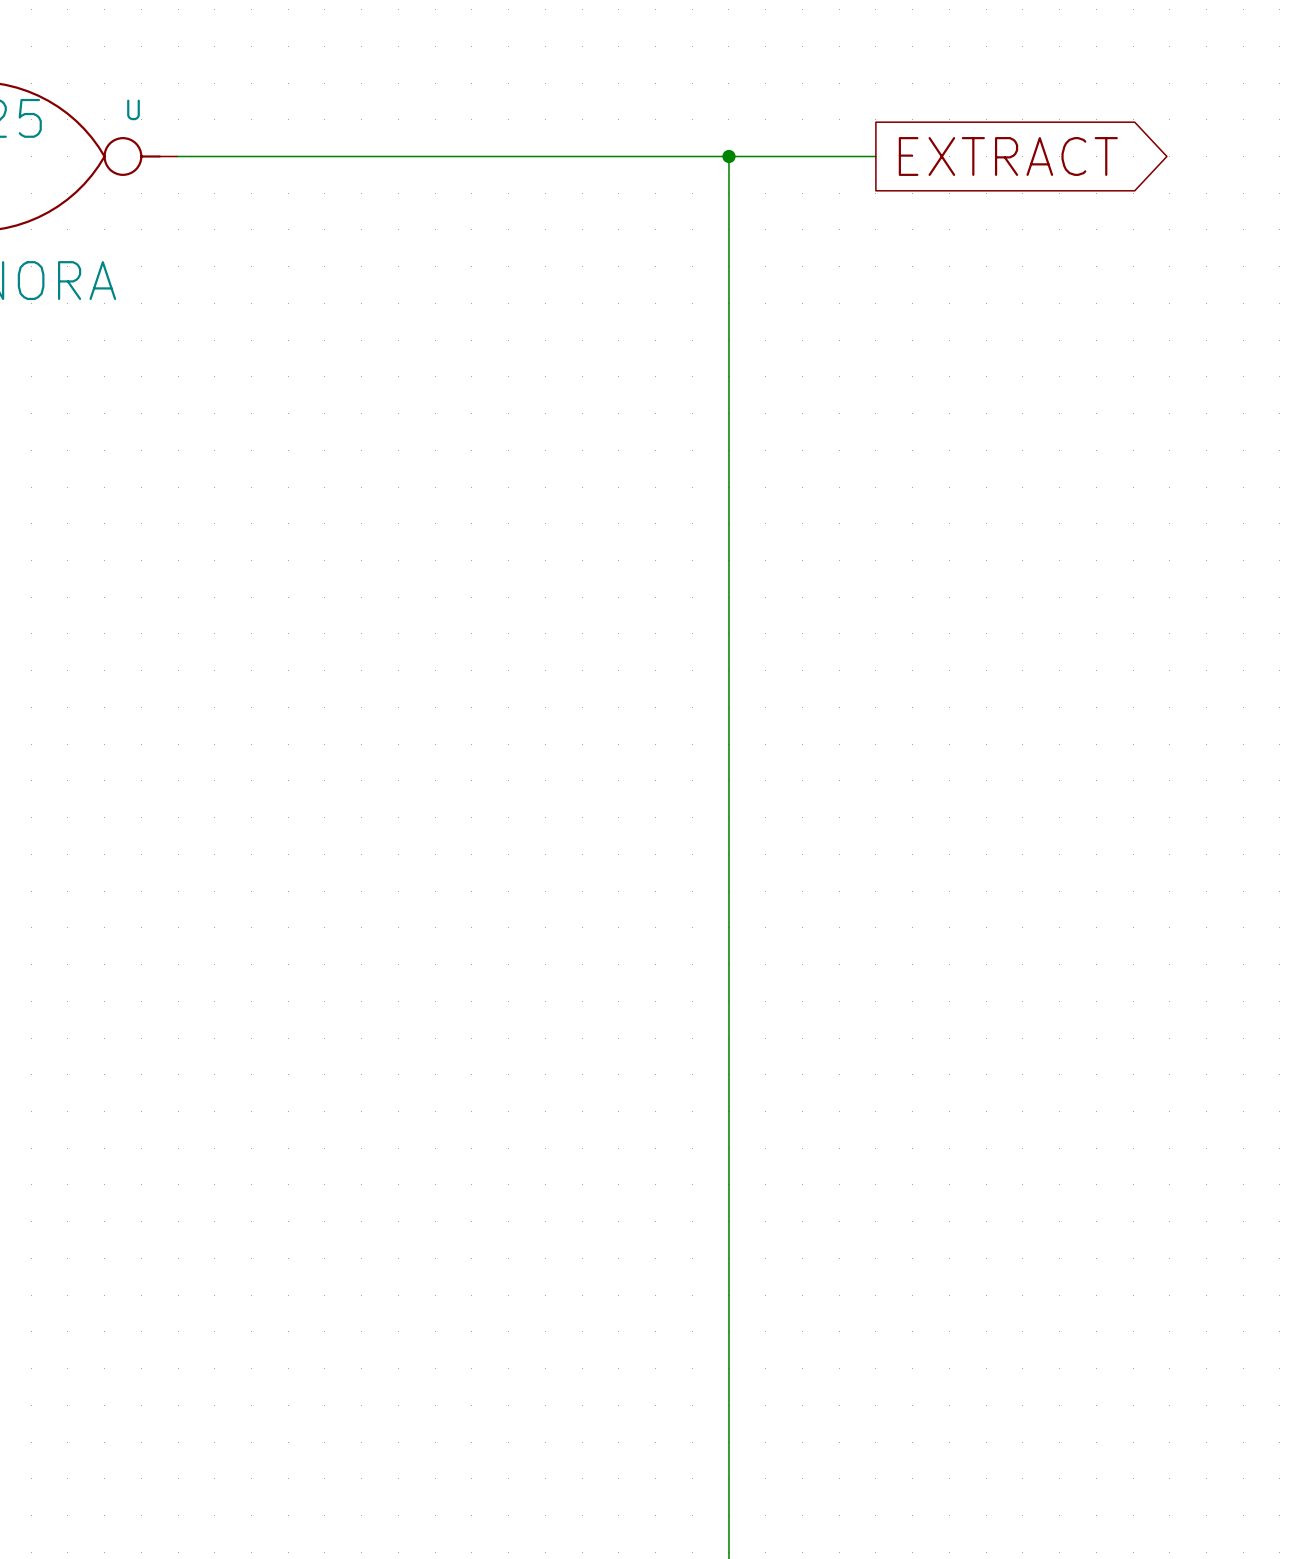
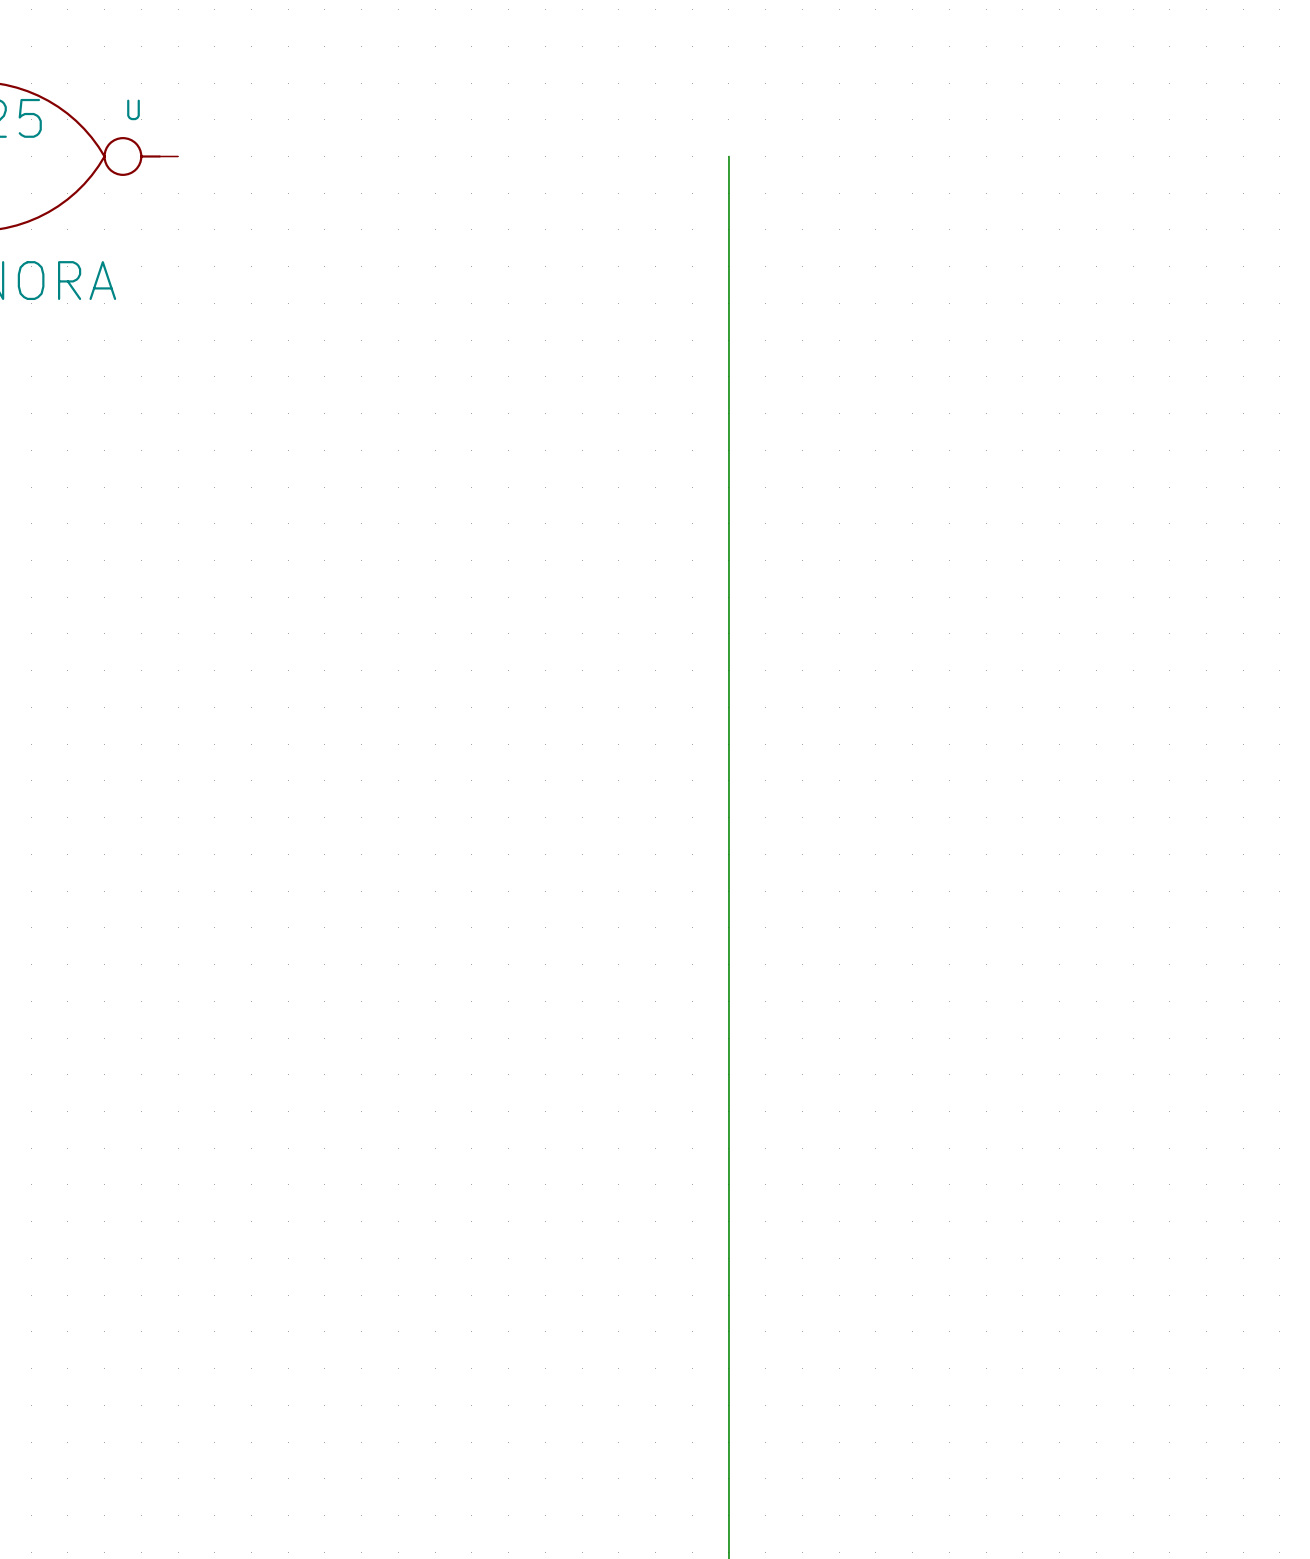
wire: (178, 156) (875, 156) -> none
junction: (728, 156) -> none
global label: EXTRACT (1008, 156) -> none

